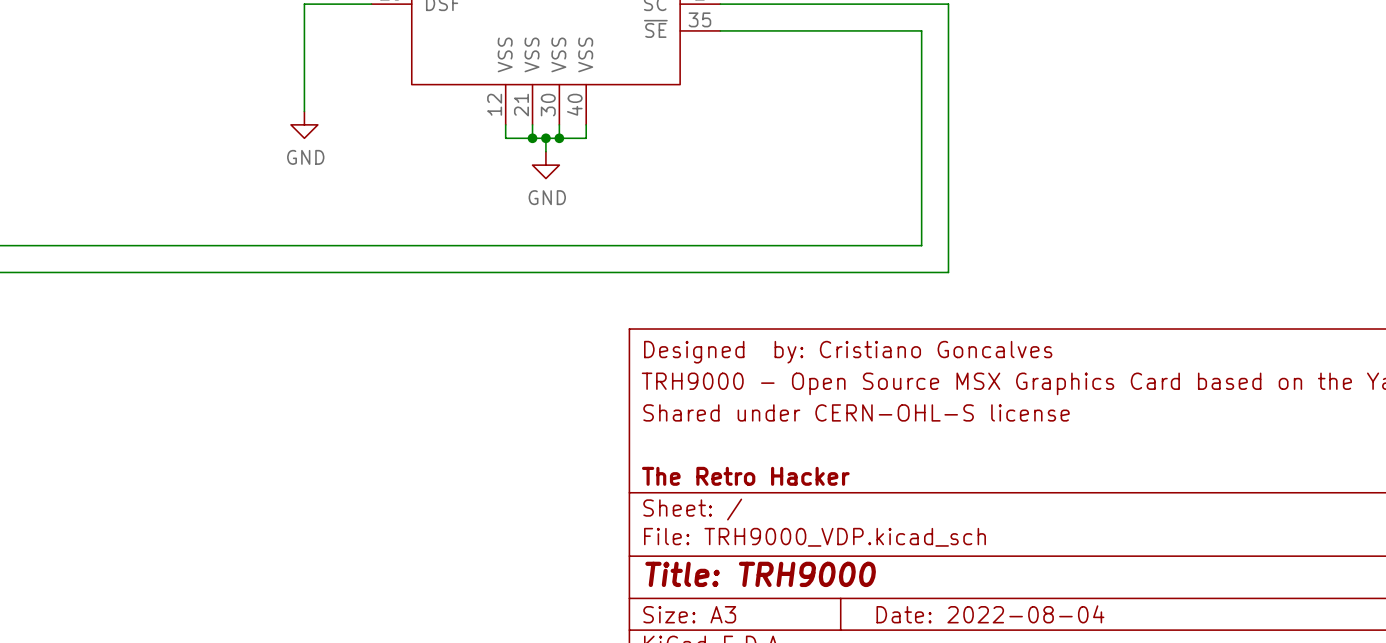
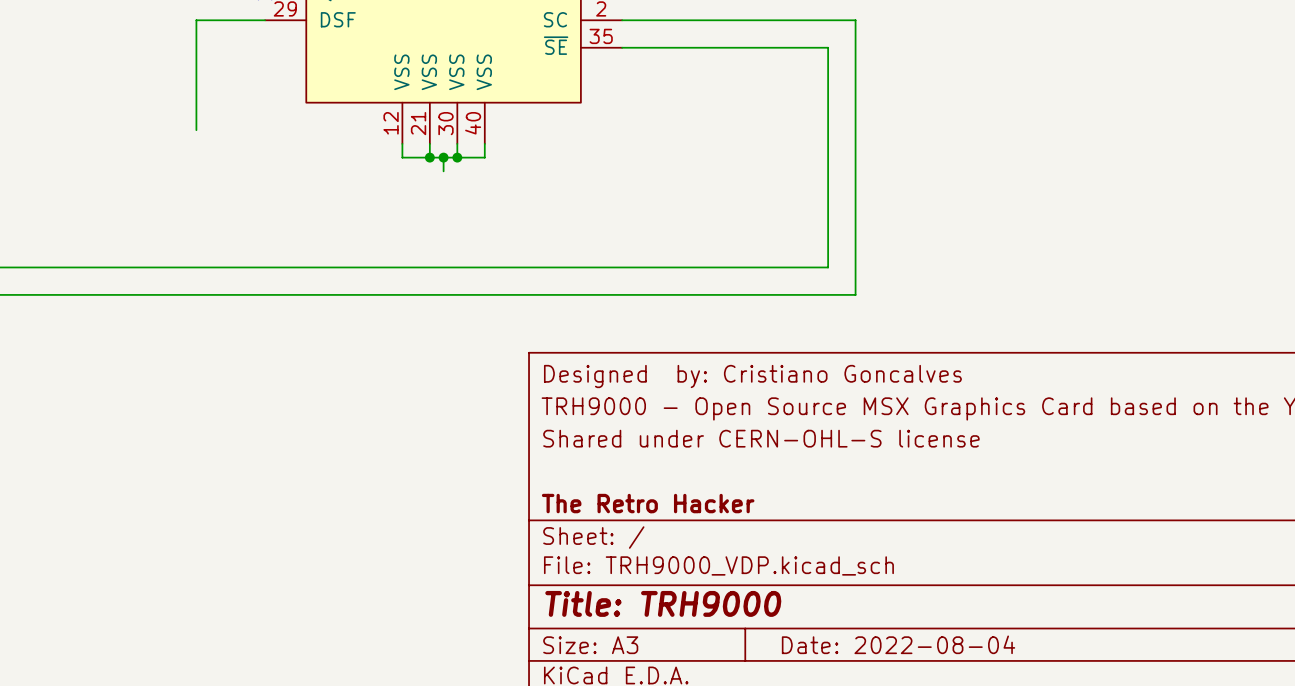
power symbol: GND (304, 124) -> none
power symbol: GND (545, 165) -> none

